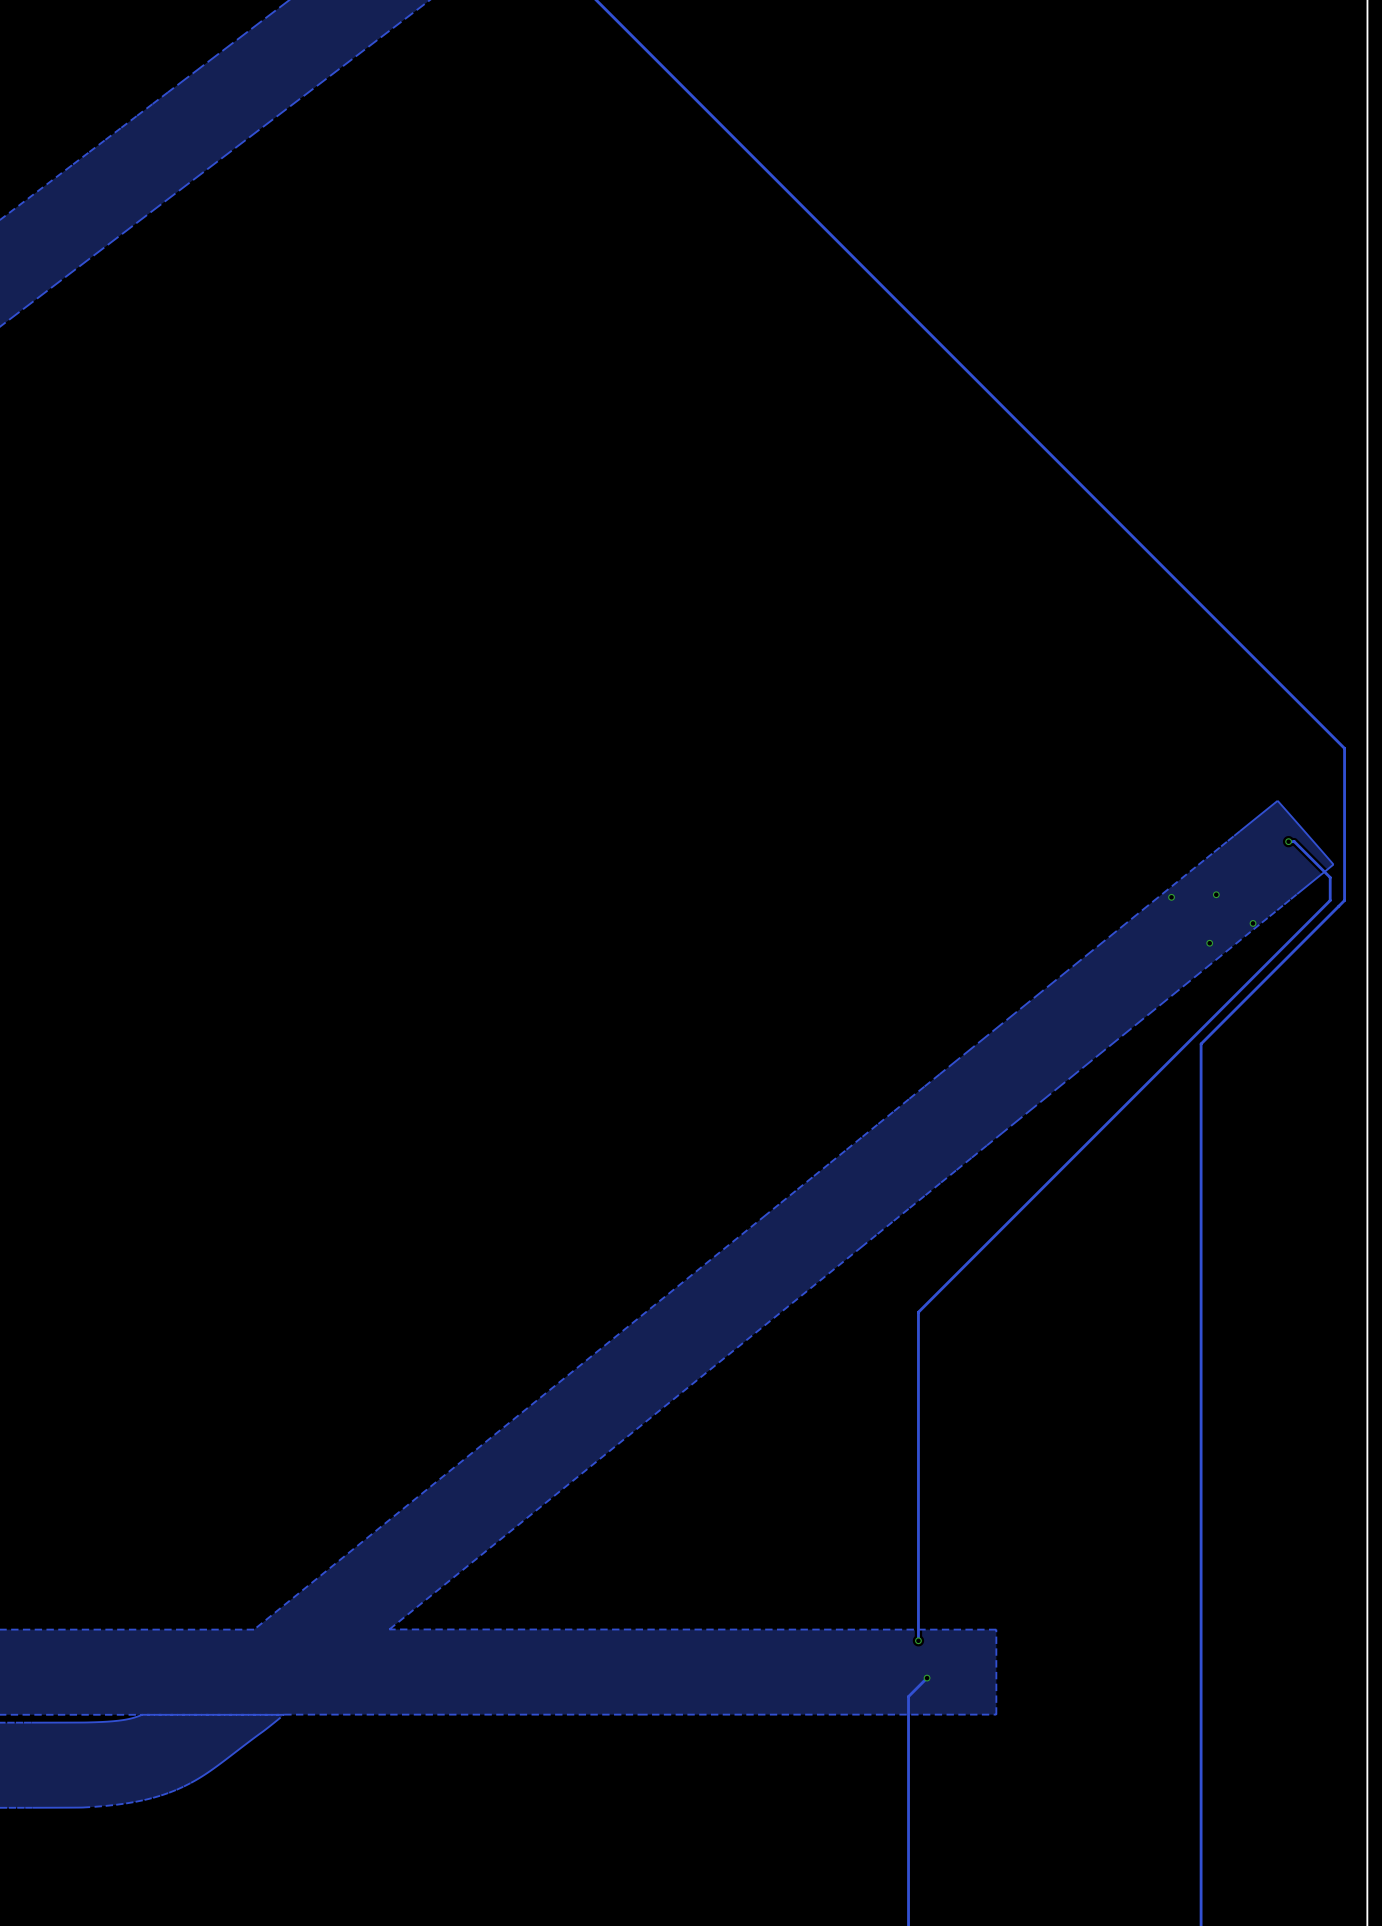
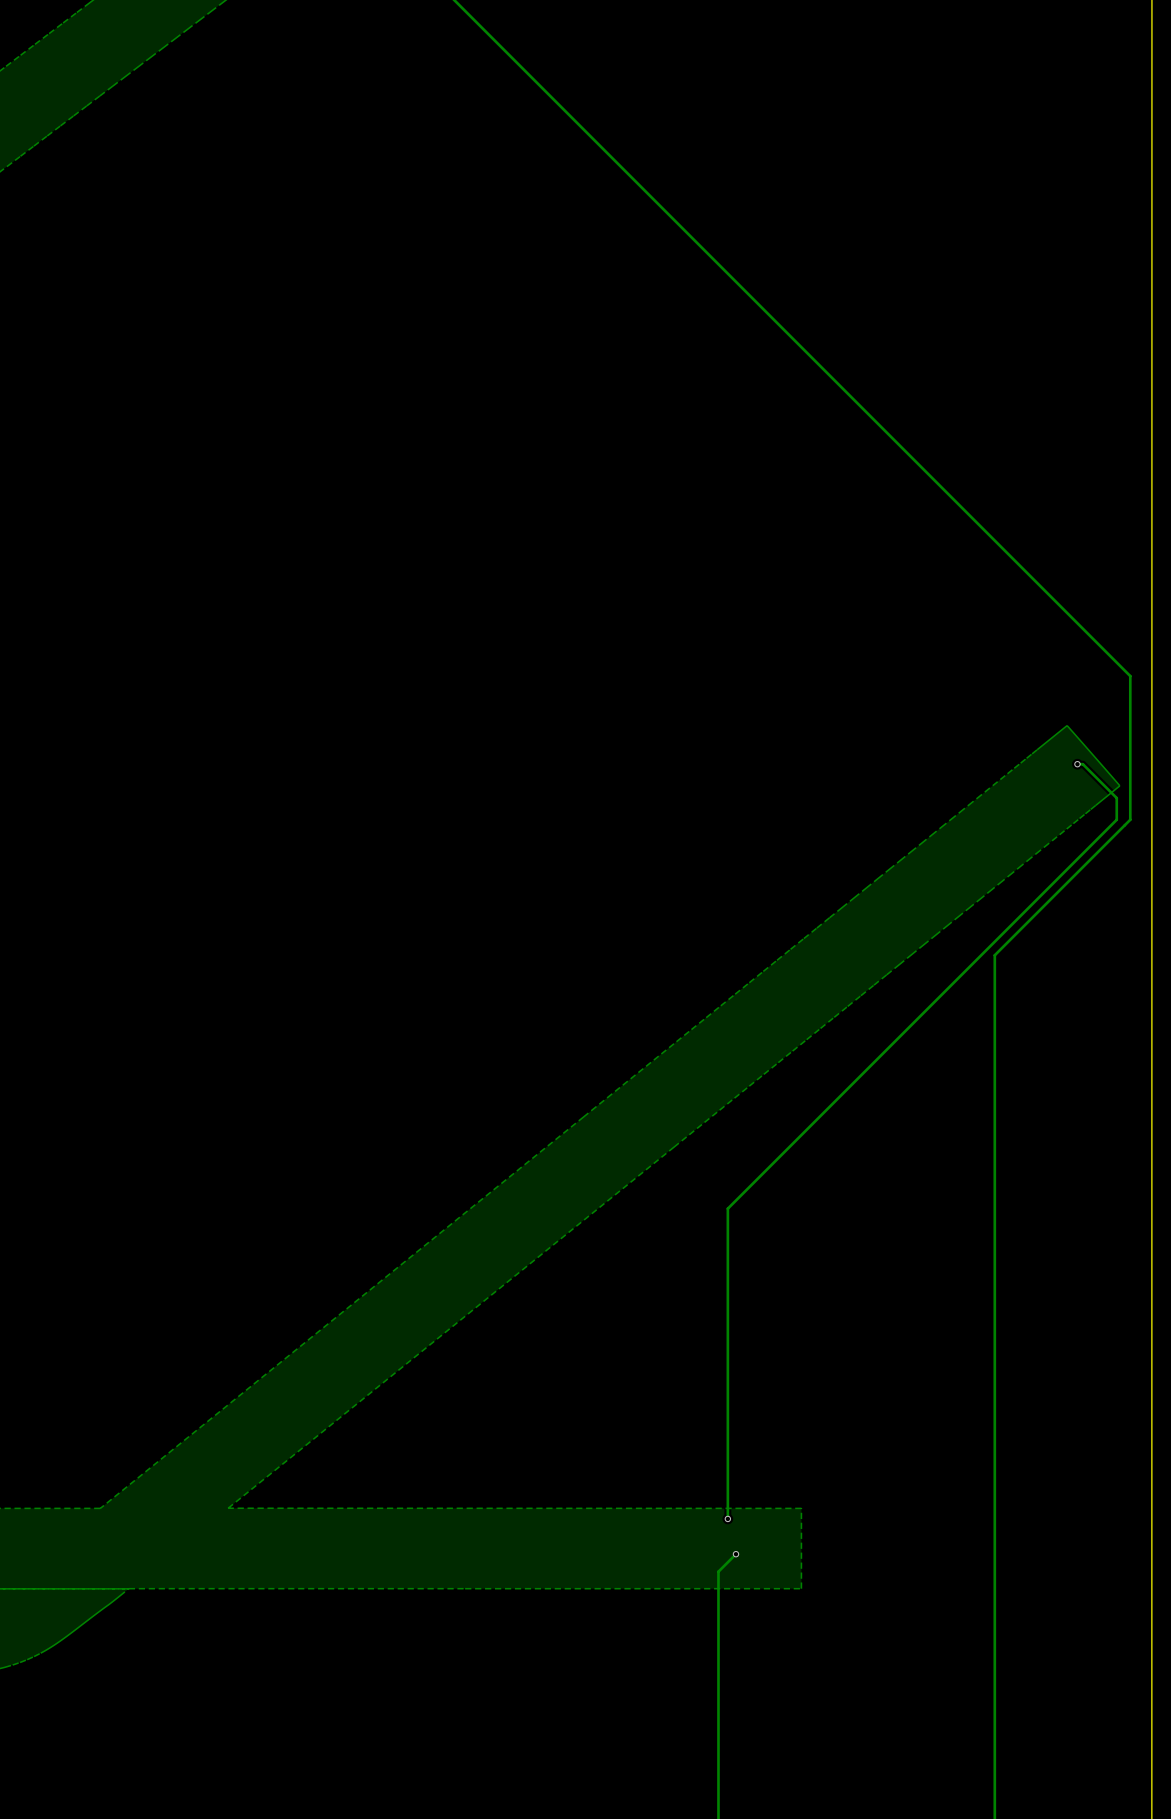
via: (1216, 894) -> none
via: (1171, 897) -> none
via: (1253, 923) -> none
via: (1209, 943) -> none

